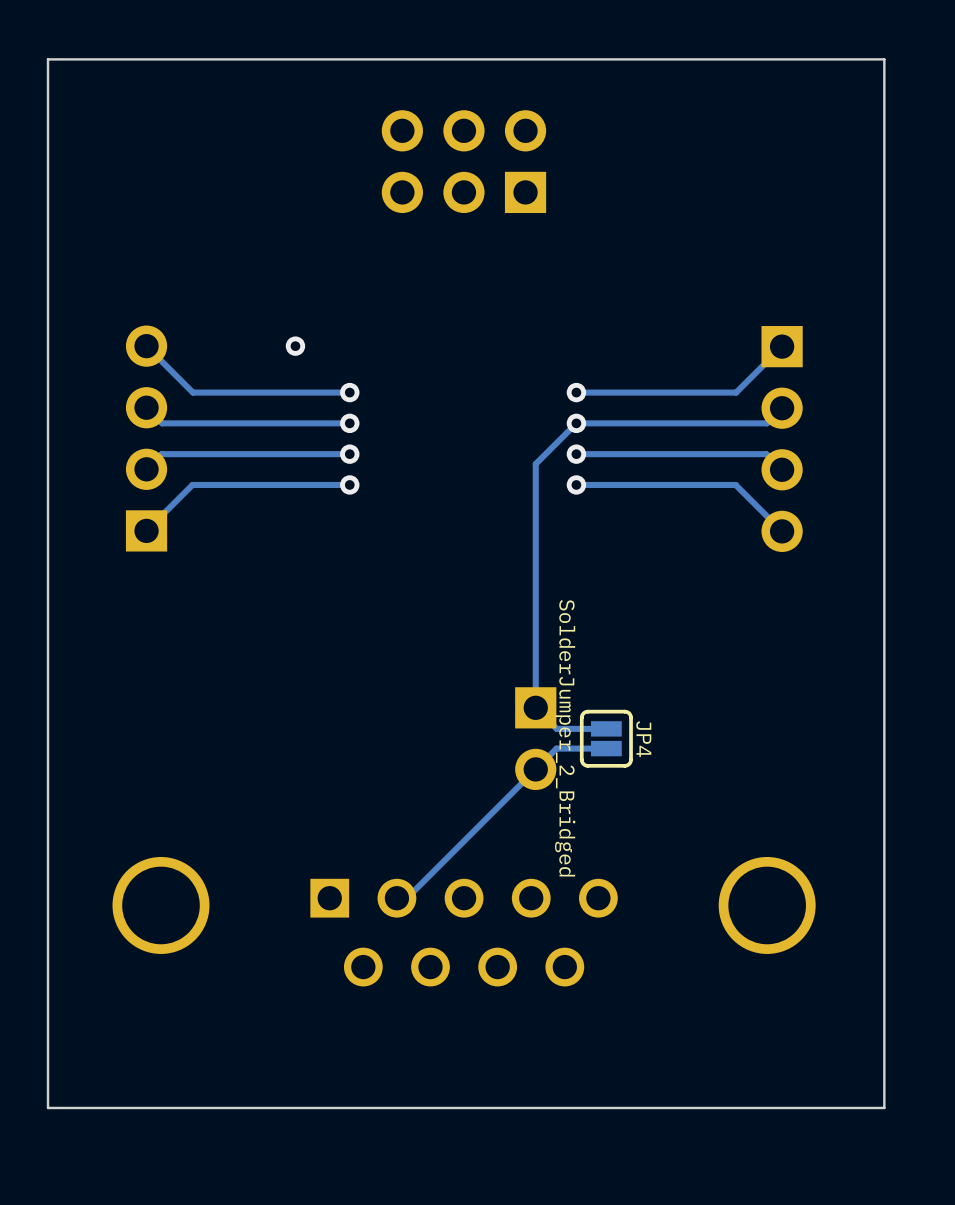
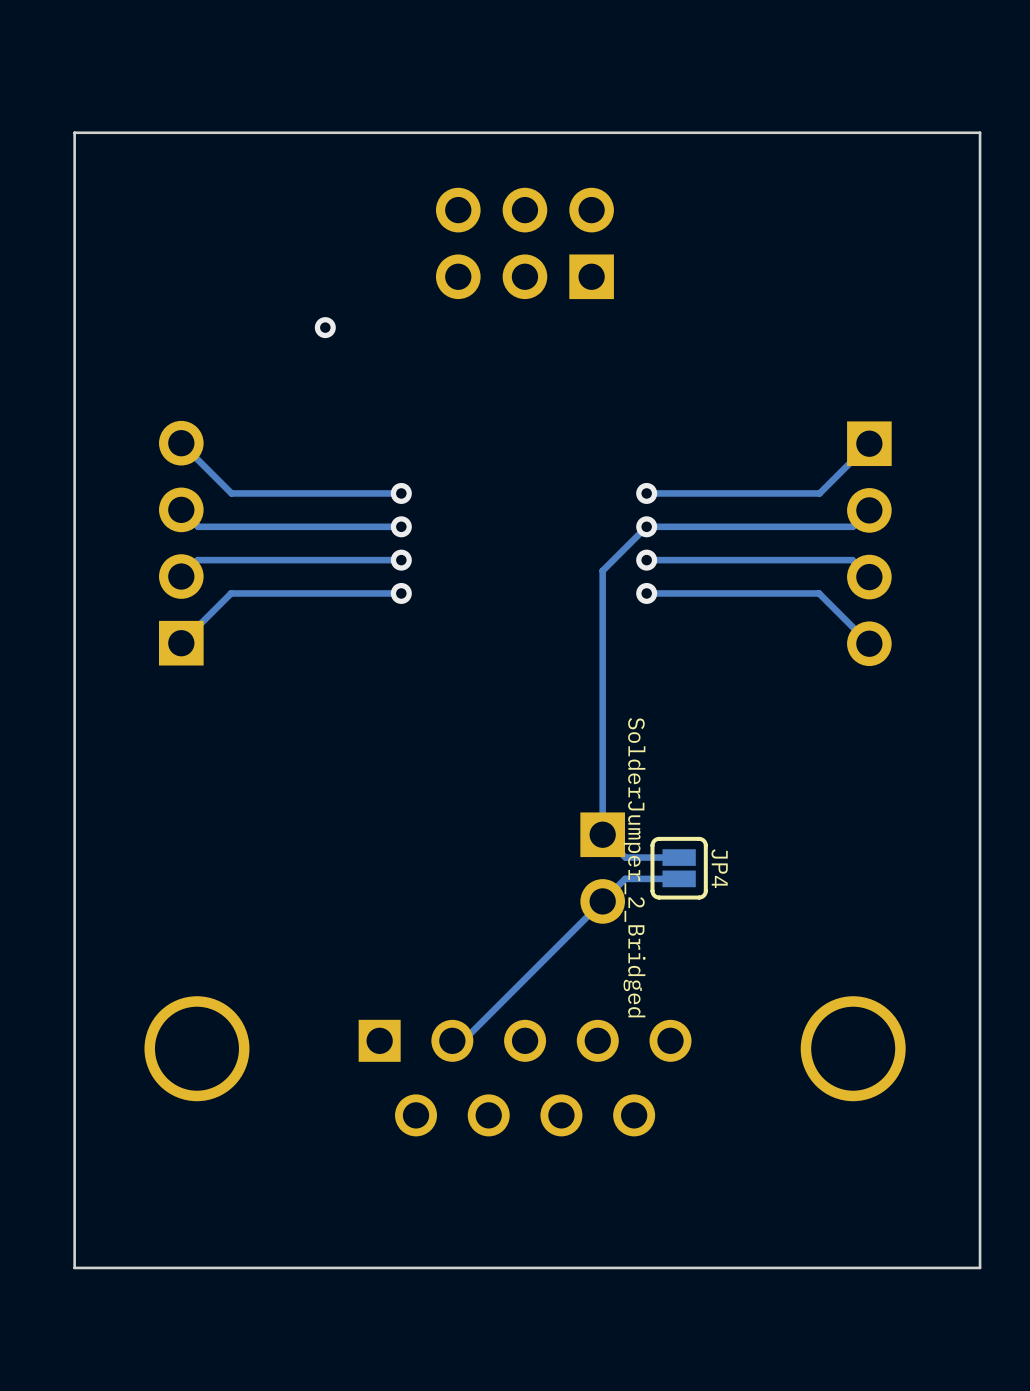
via position: (295, 346) -> (325, 327)

